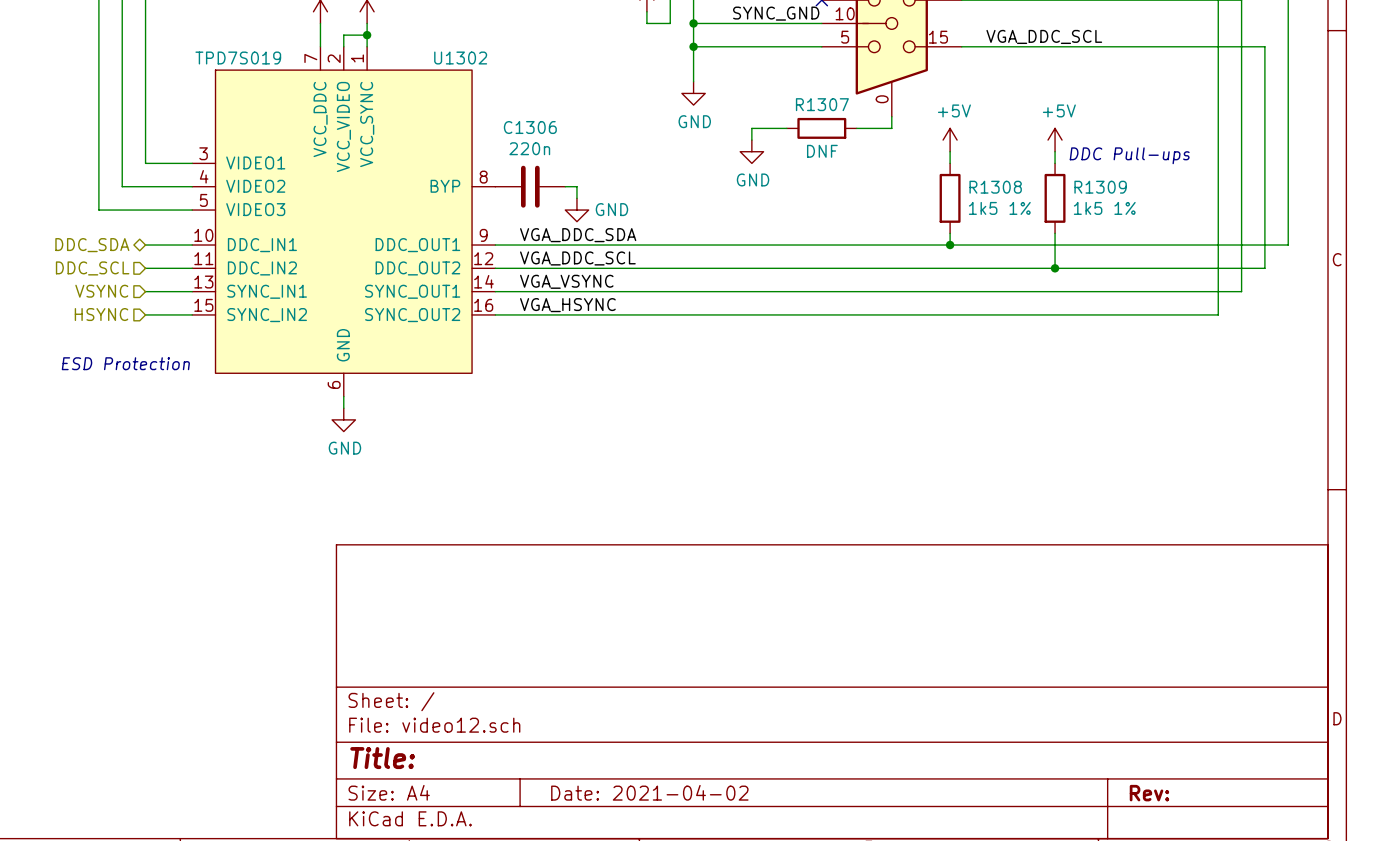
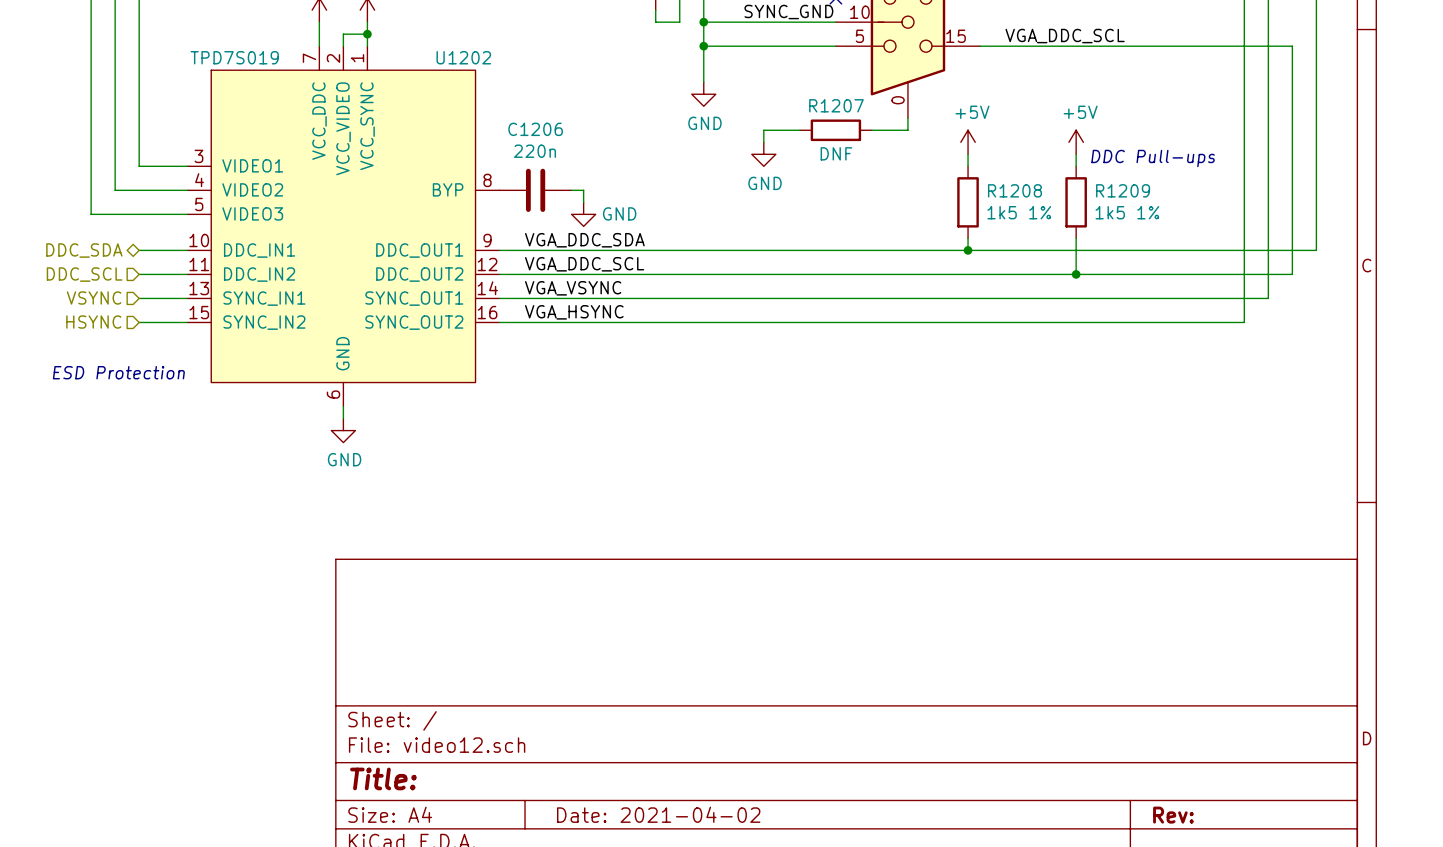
U1302 name: U1302 (460, 58) -> U1202 (463, 57)
R1307 name: R1307 (822, 104) -> R1207 (836, 105)
C1306 name: C1306 (530, 127) -> C1206 (535, 129)
R1308 name: R1308 (995, 187) -> R1208 (1014, 190)
R1309 name: R1309 (1100, 187) -> R1209 (1123, 190)

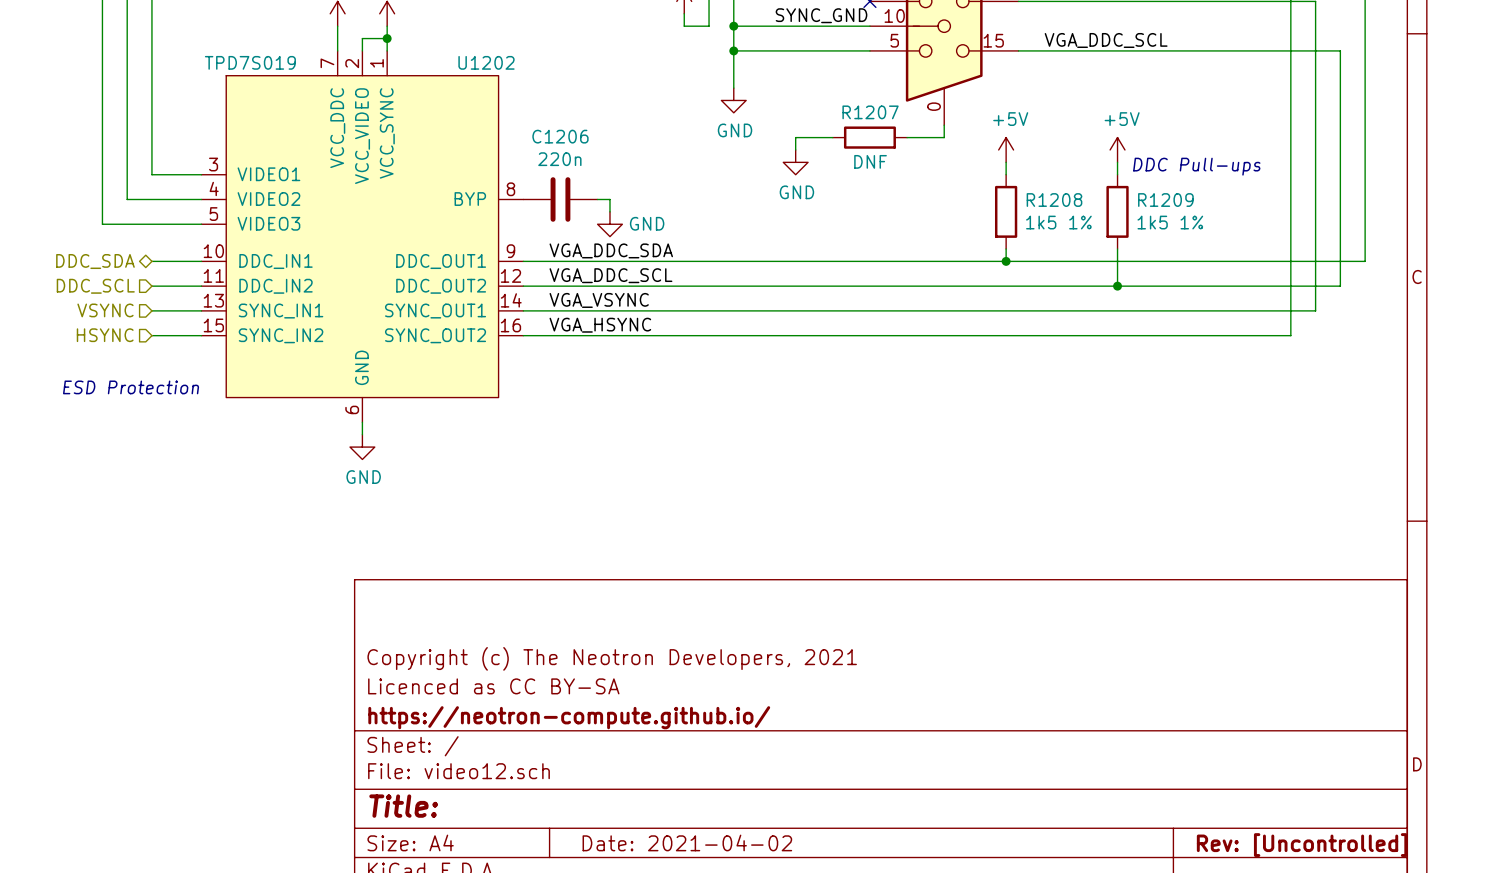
title block: none -> Copyright (c) The Neotron Developers, 2021 (612, 658)
title block: none -> Licenced as CC BY-SA (493, 686)
title block: none -> https://neotron-compute.github.io/ (569, 717)
title block: Rev: (1173, 815) -> Rev: [Uncontrolled] (1302, 845)

